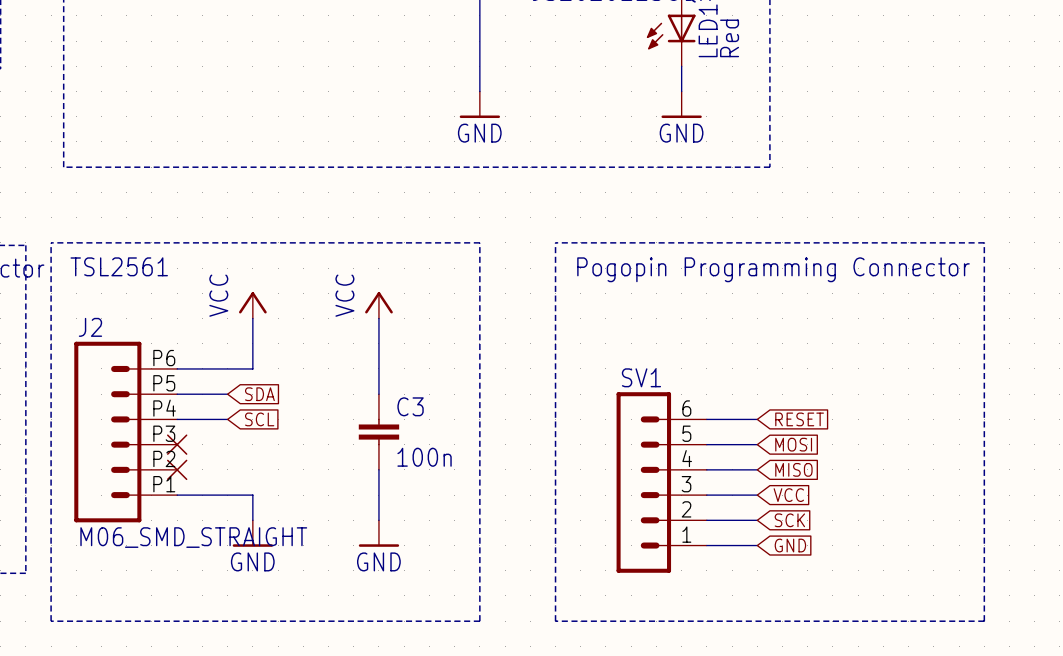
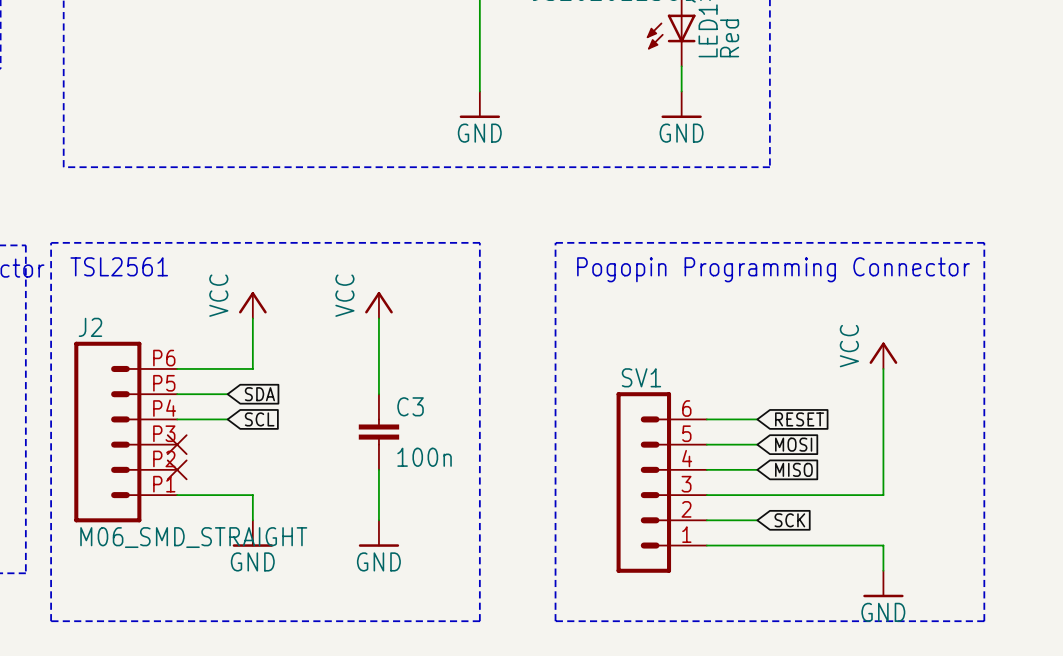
power symbol: none -> VCC (883, 355)
wire: none -> (883, 368) (883, 495) (757, 495)
global label: VCC (788, 495) -> none
wire: none -> (757, 545) (883, 545) (883, 570)
global label: GND (790, 545) -> none
power symbol: none -> GND (883, 584)

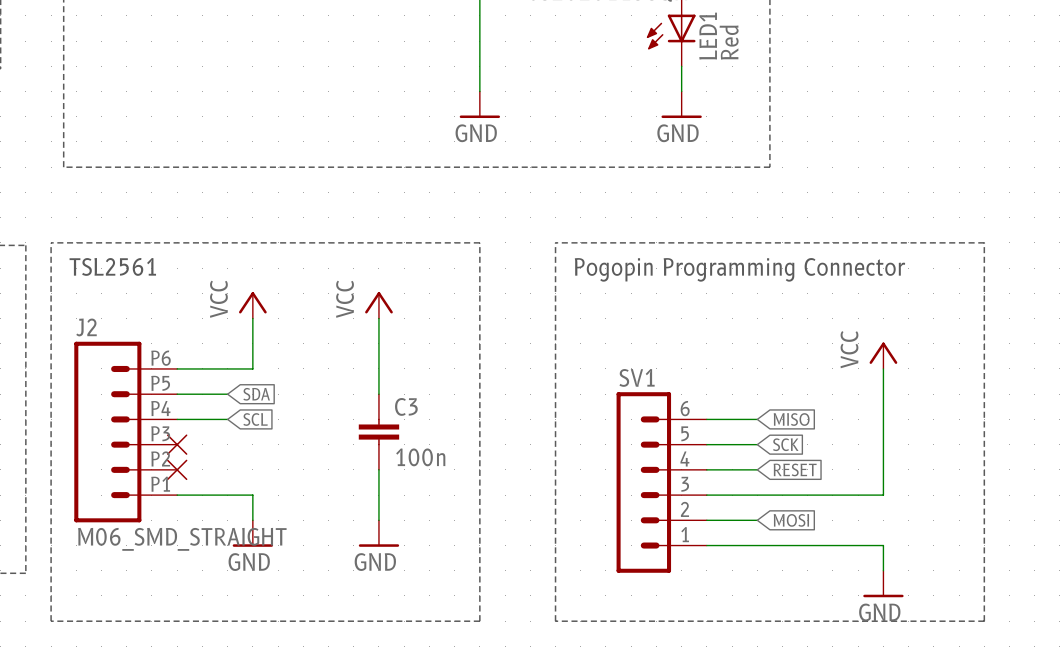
global label: RESET (799, 419) -> MISO (791, 419)
global label: MOSI (793, 444) -> SCK (785, 444)
global label: MISO (793, 469) -> RESET (795, 469)
global label: SCK (789, 520) -> MOSI (791, 520)

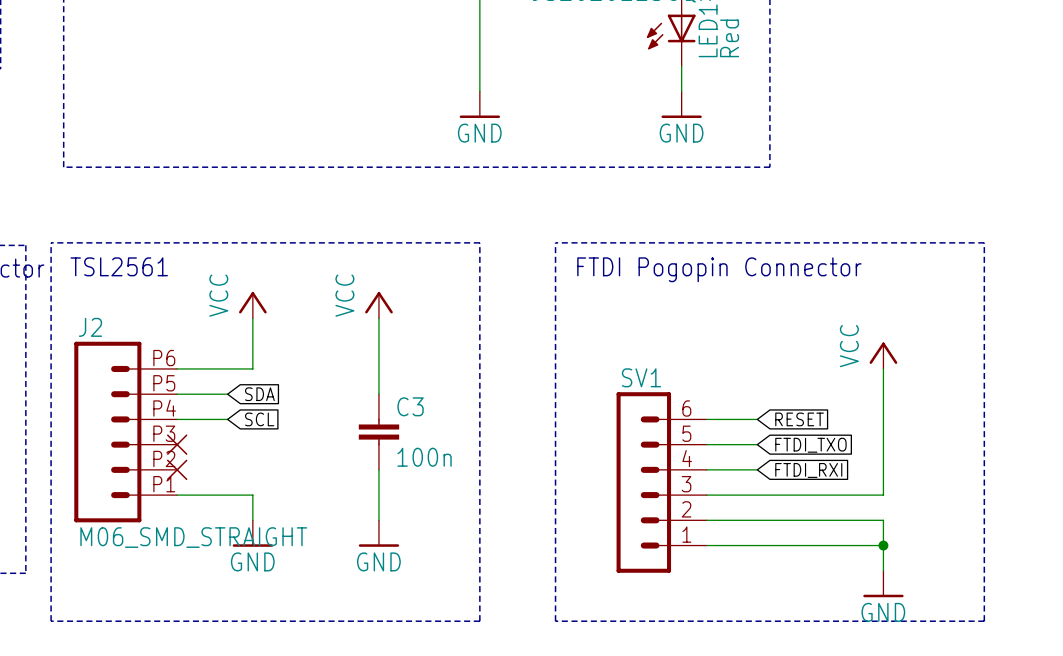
text: Pogopin Programming Connector (739, 269) -> FTDI Pogopin Connector (719, 269)
global label: MISO (791, 419) -> RESET (799, 419)
global label: SCK (785, 444) -> FTDI_TXO (810, 445)
global label: RESET (795, 469) -> FTDI_RXI (808, 470)
wire: none -> (757, 520) (883, 520) (883, 545)
global label: MOSI (791, 520) -> none
junction: none -> (883, 545)

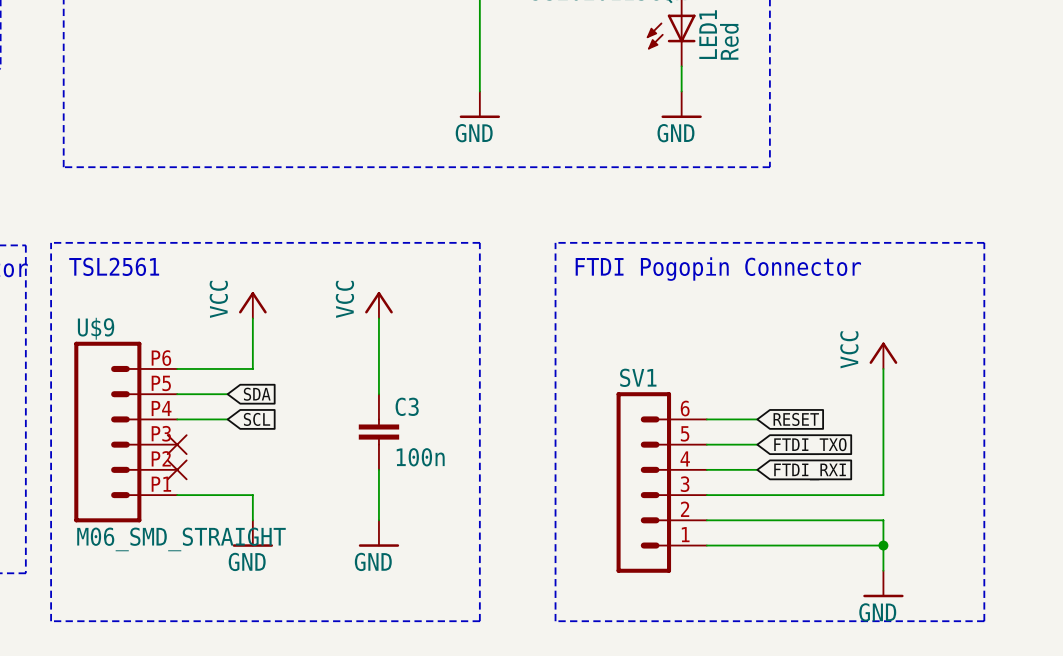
J2 name: J2 (90, 327) -> U$9 (96, 328)

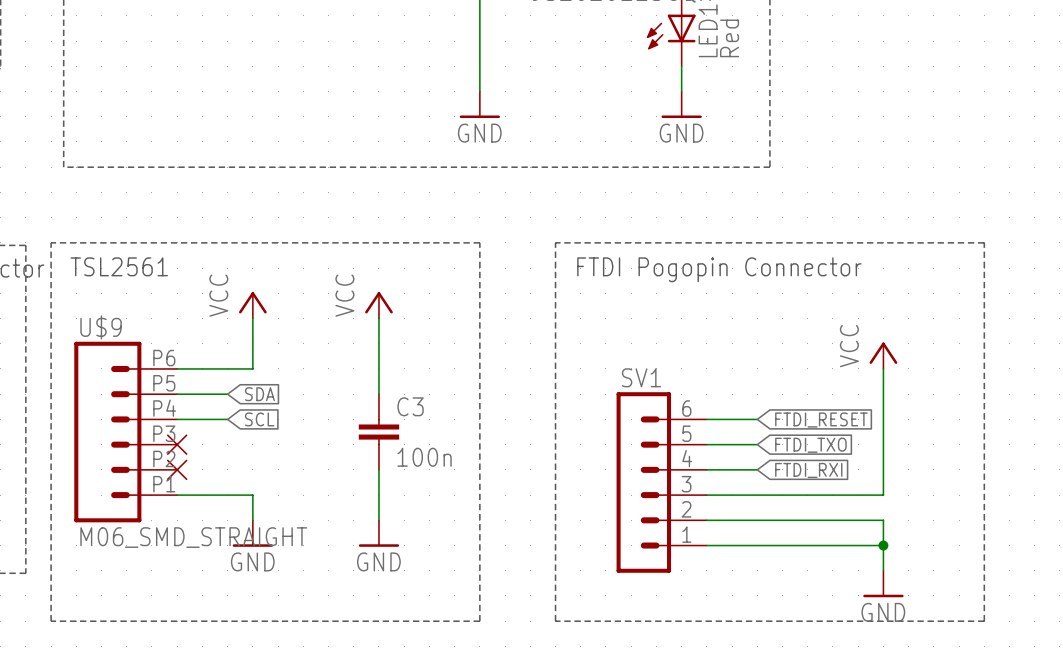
global label: RESET (796, 419) -> FTDI_RESET (821, 420)

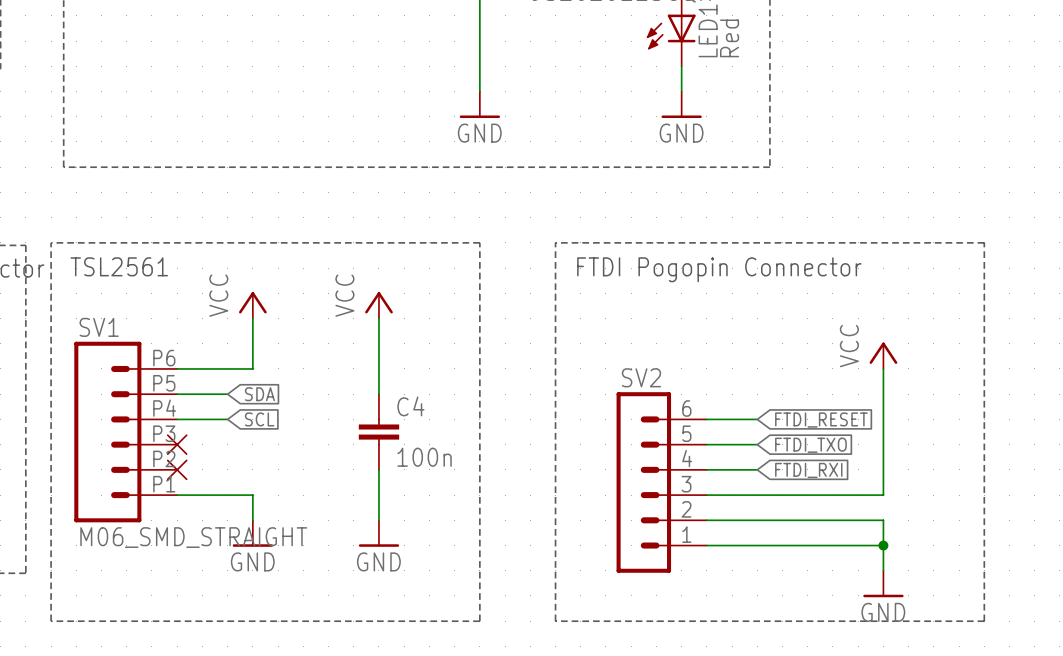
U$9 name: U$9 (101, 327) -> SV1 (99, 327)
SV1 name: SV1 (641, 377) -> SV2 (641, 377)
C3 name: C3 (410, 406) -> C4 (410, 406)

